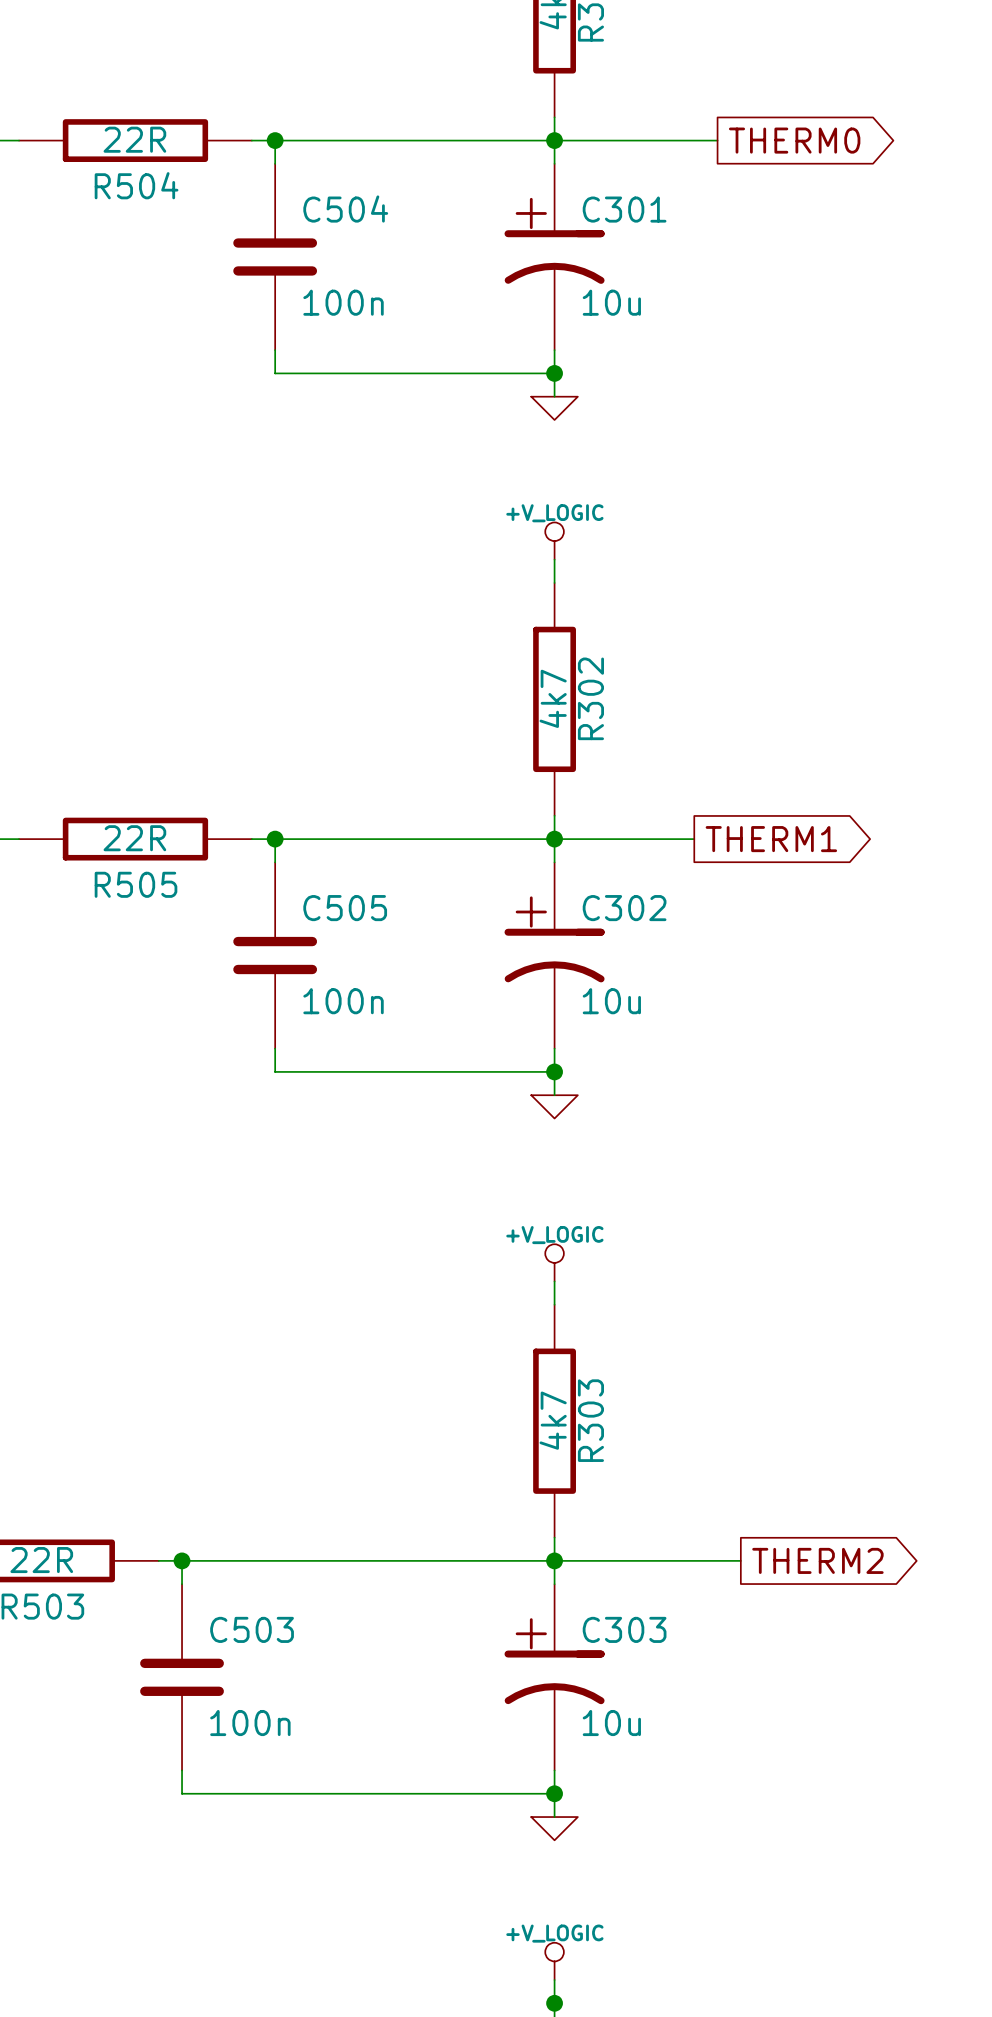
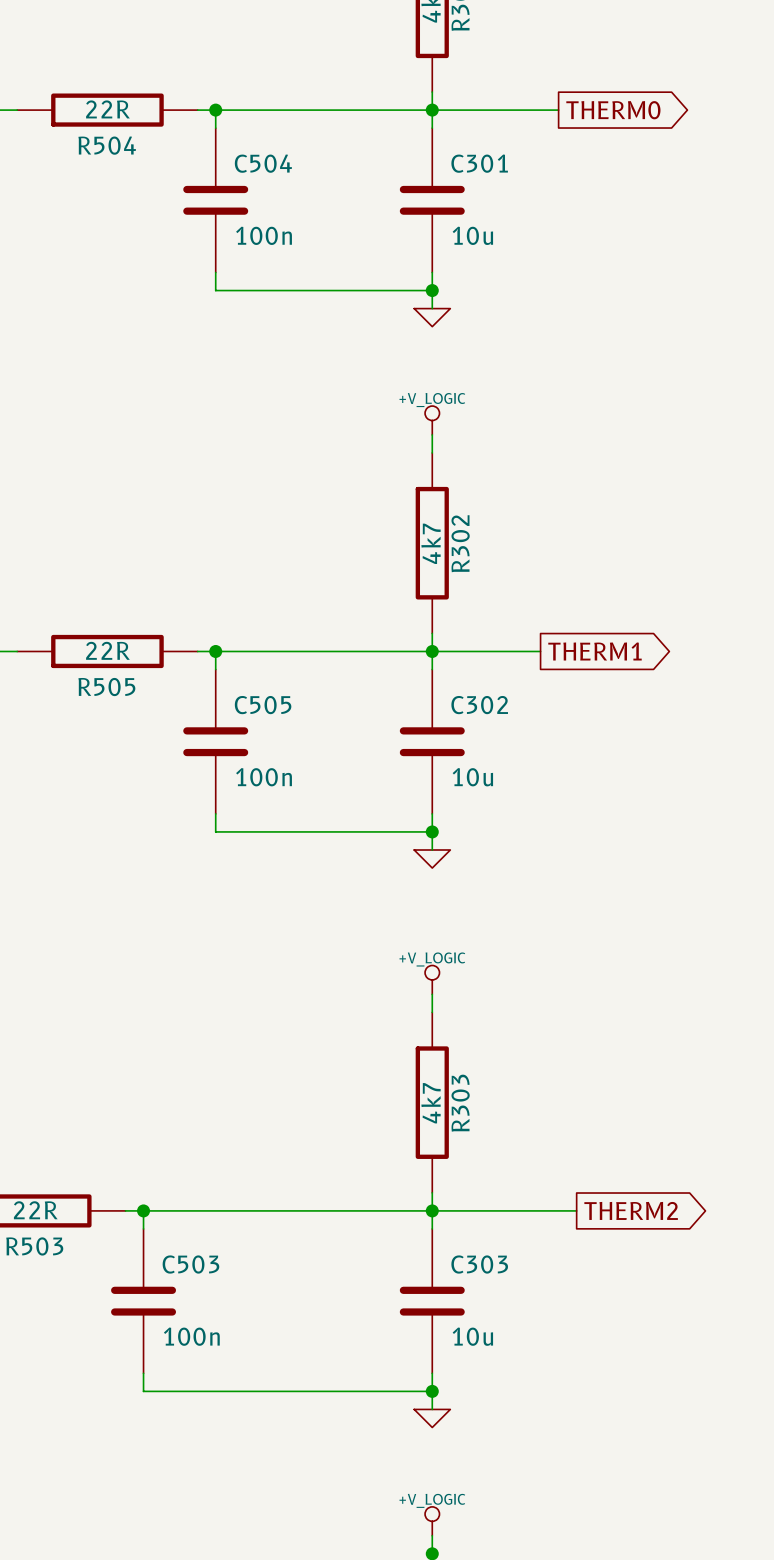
C301 symbol: [504, 163, 605, 351] -> [399, 128, 465, 273]
C302 symbol: [504, 862, 605, 1049] -> [399, 669, 465, 814]
C303 symbol: [504, 1584, 605, 1771] -> [399, 1228, 465, 1374]

